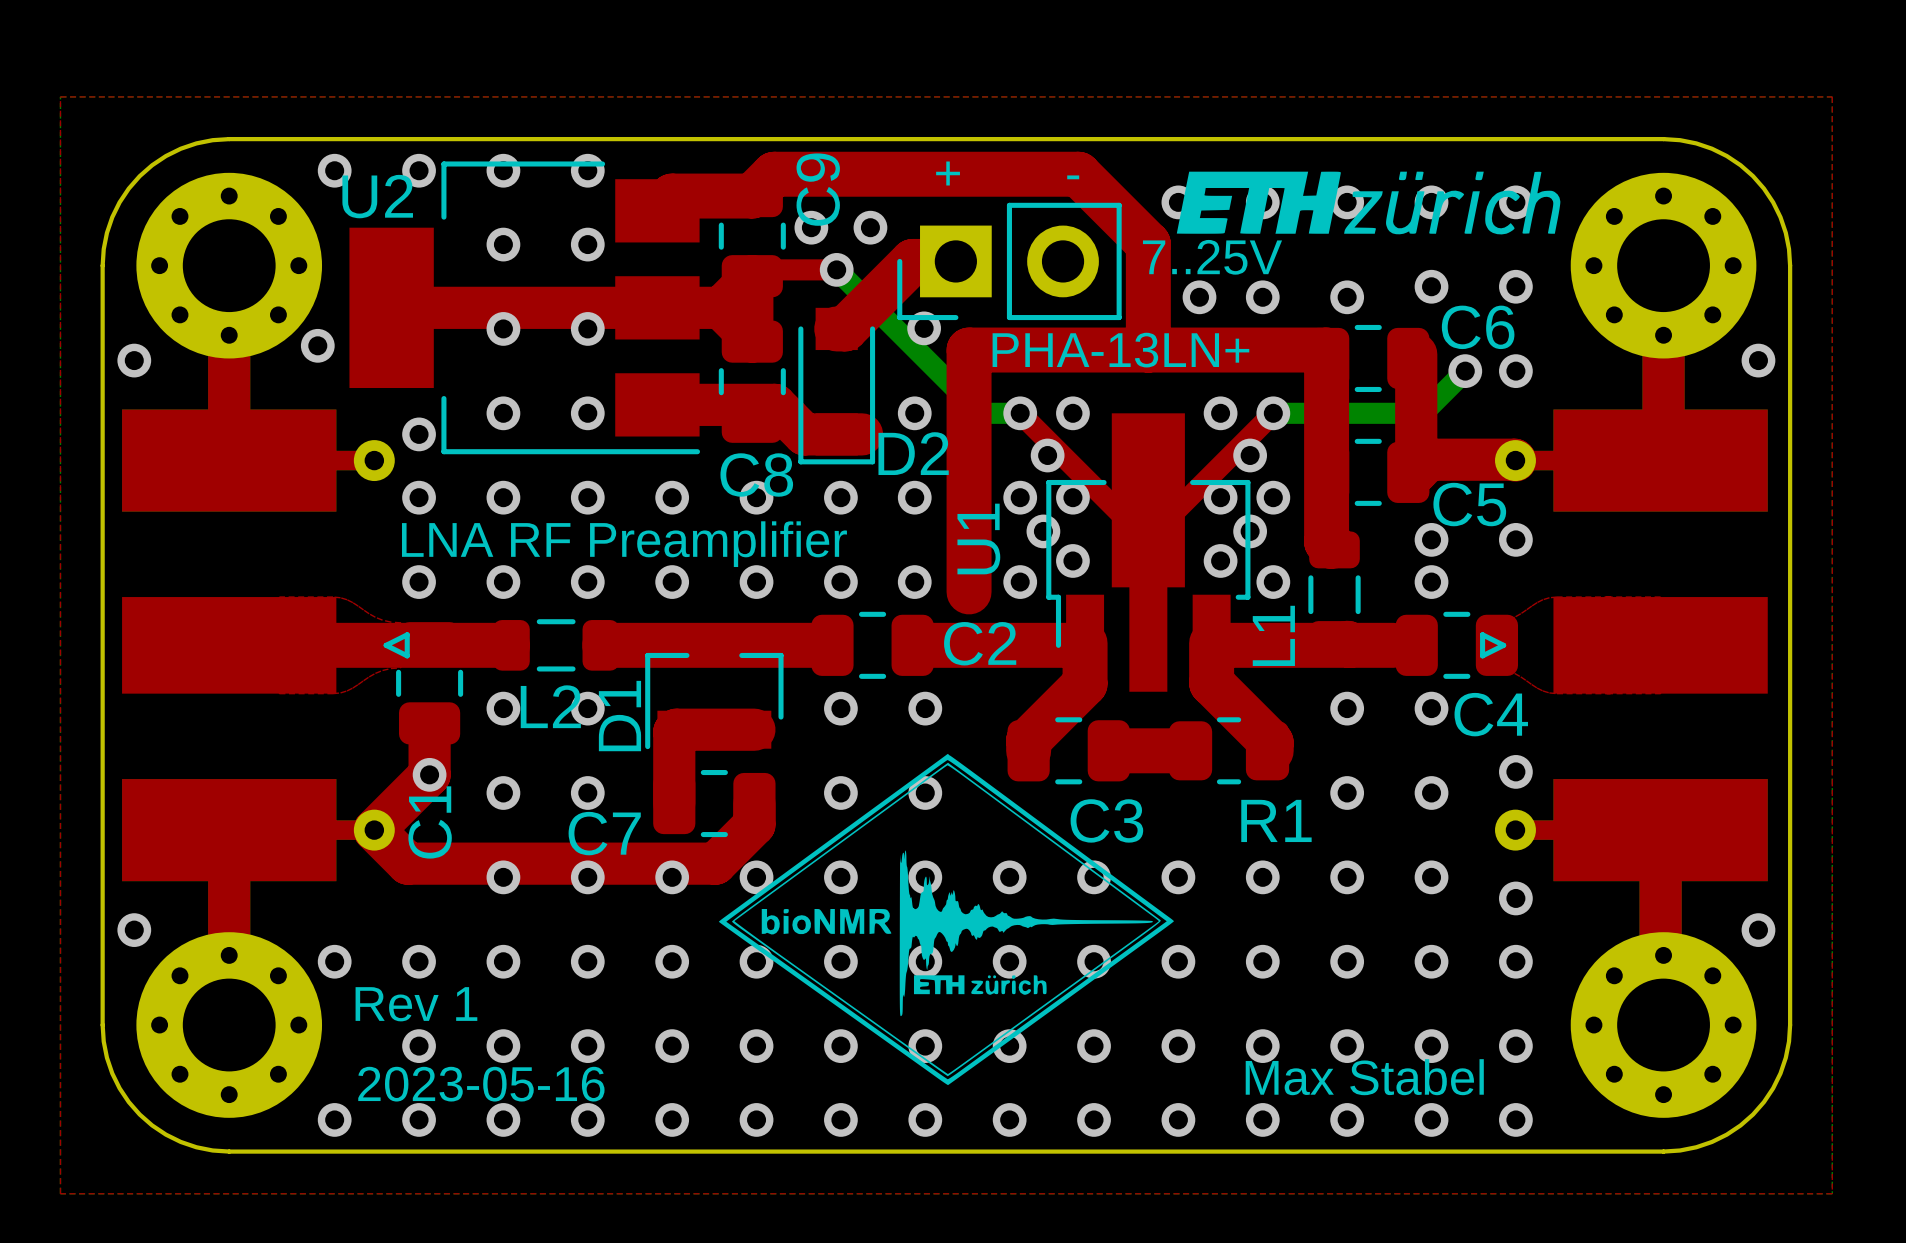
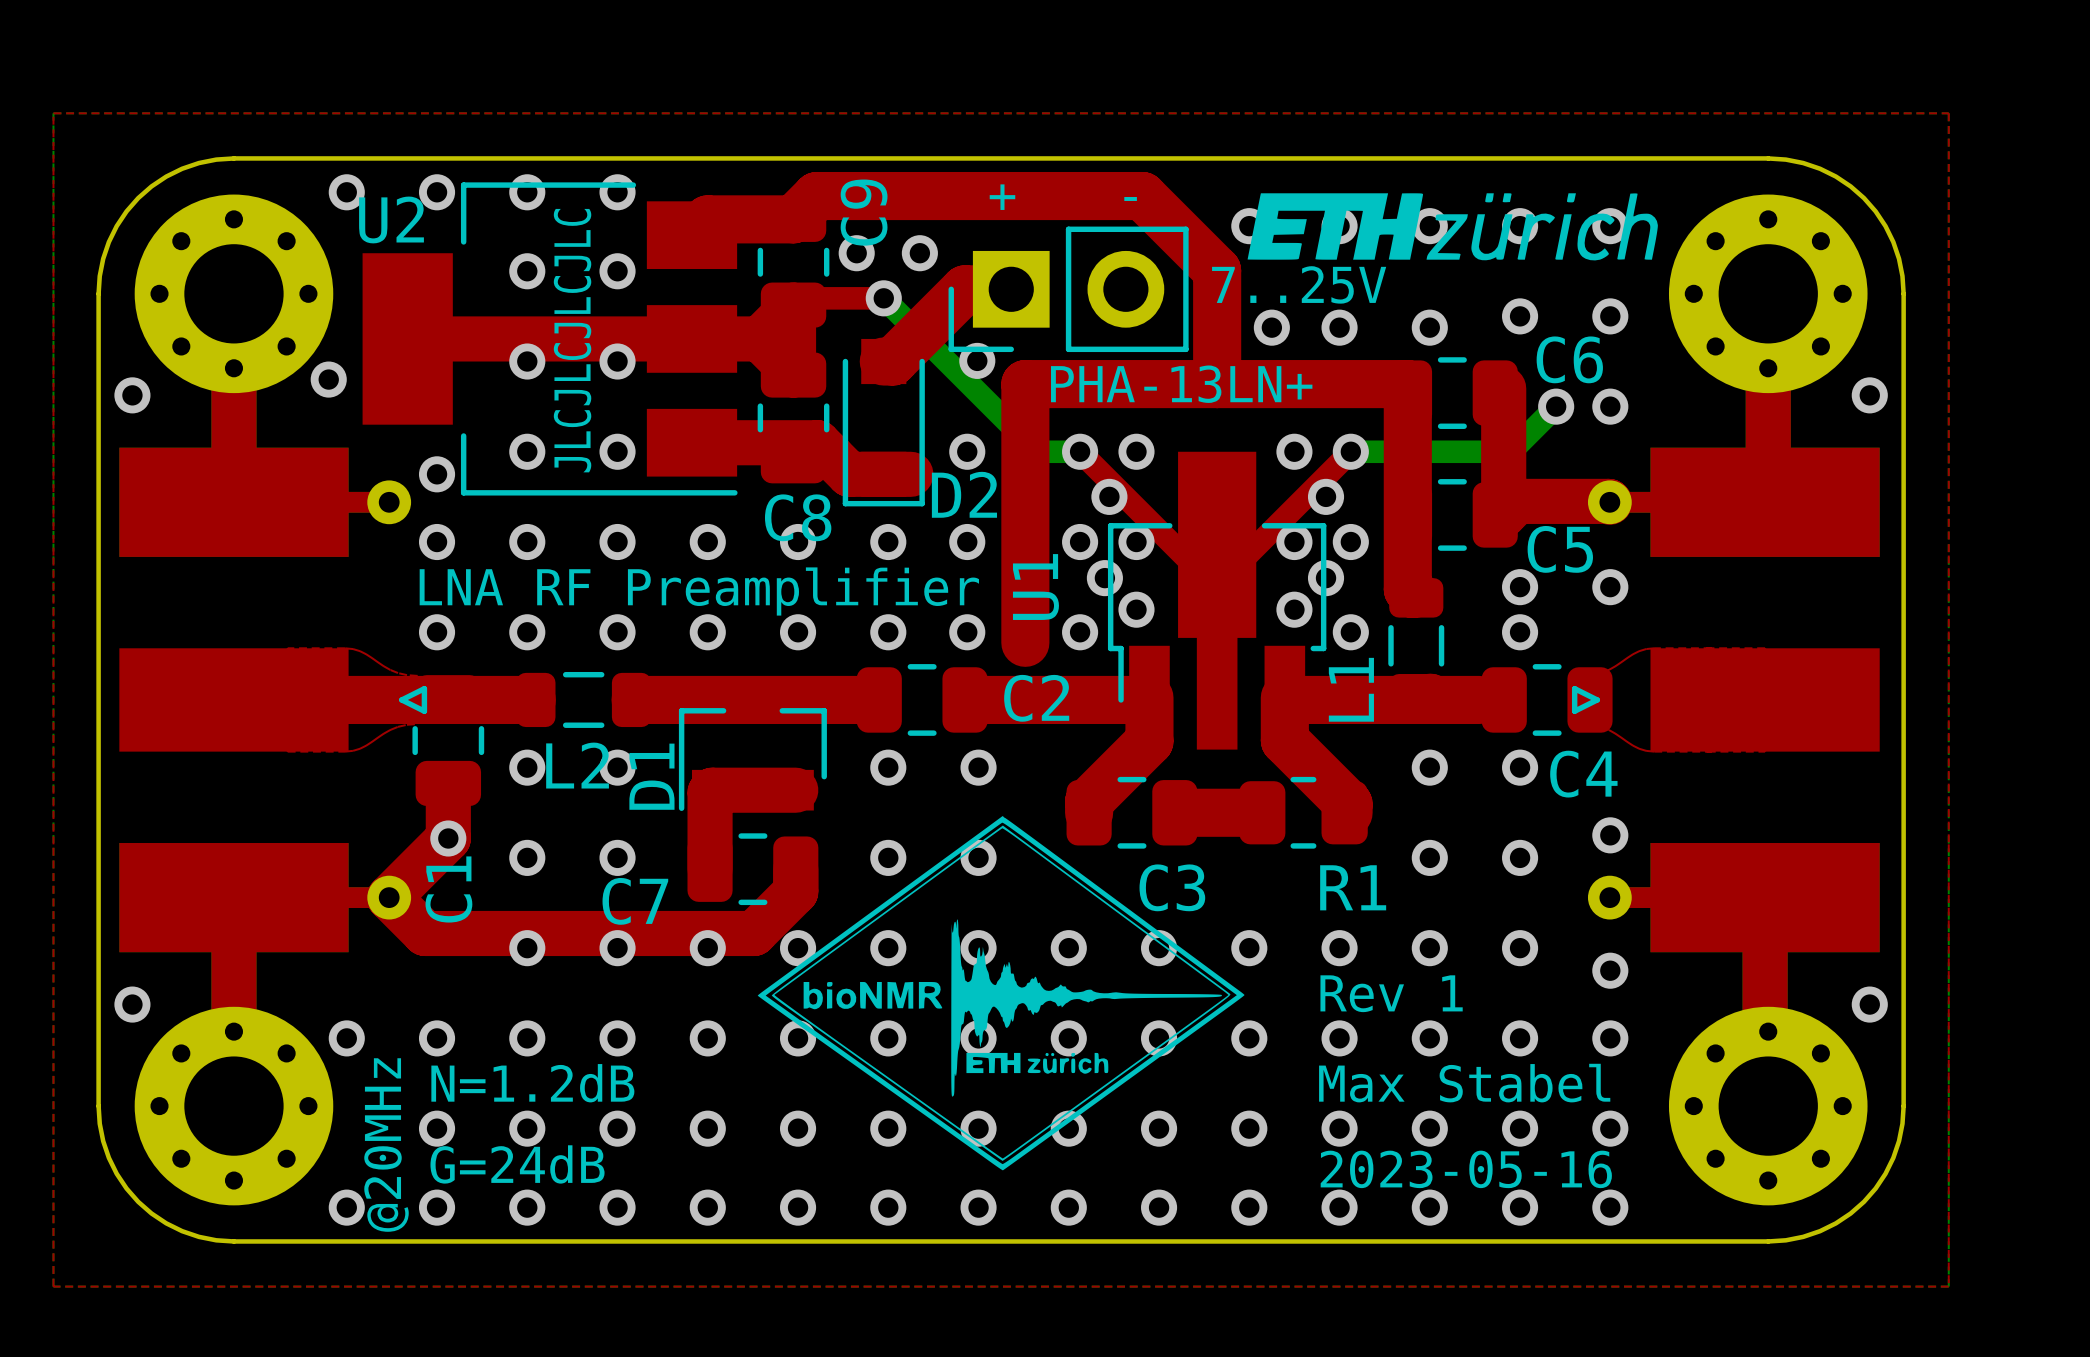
text: none -> JLCJLCJLCJLC (572, 340)
text: none -> N=1.2dB (532, 1083)
text: none -> Max Stabel (1464, 1083)
text position: Rev 1 (416, 1004) -> Rev 1 (1391, 993)
text: none -> @20MHz (386, 1145)
text: Max Stabel (1364, 1077) -> 2023-05-16 (1466, 1169)
text: none -> G=24dB (517, 1164)
text: 2023-05-16 (481, 1084) -> none

